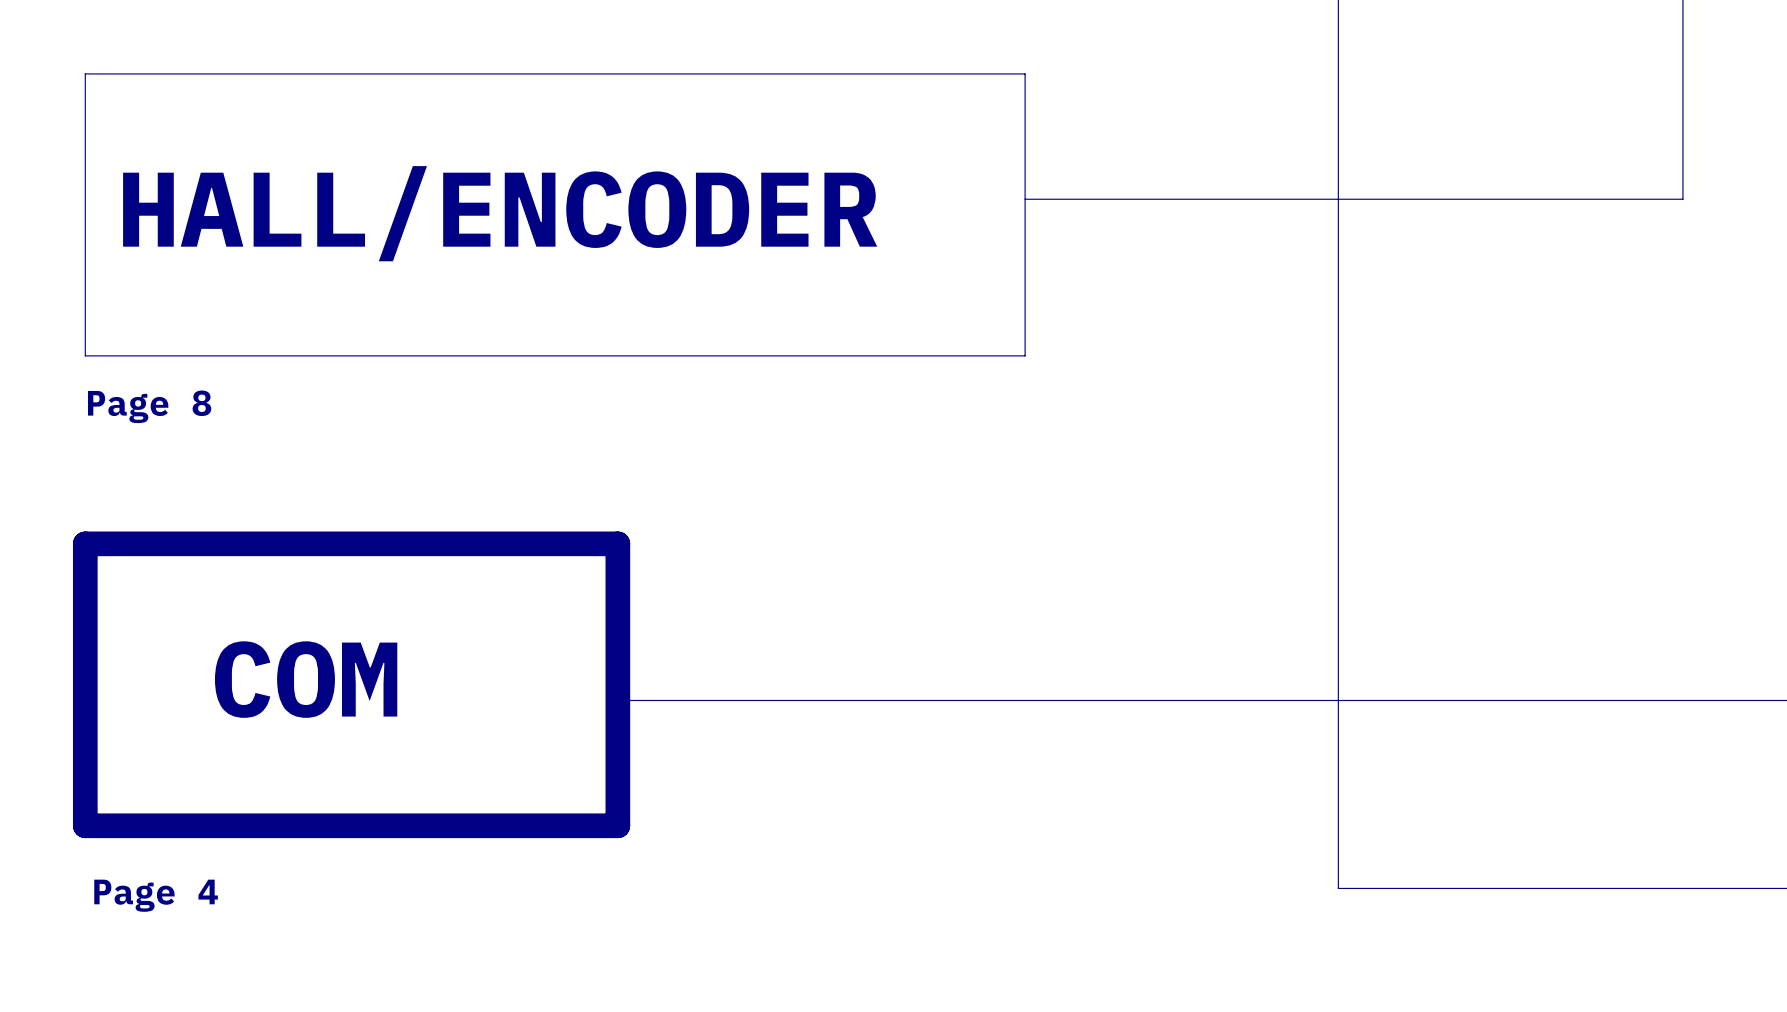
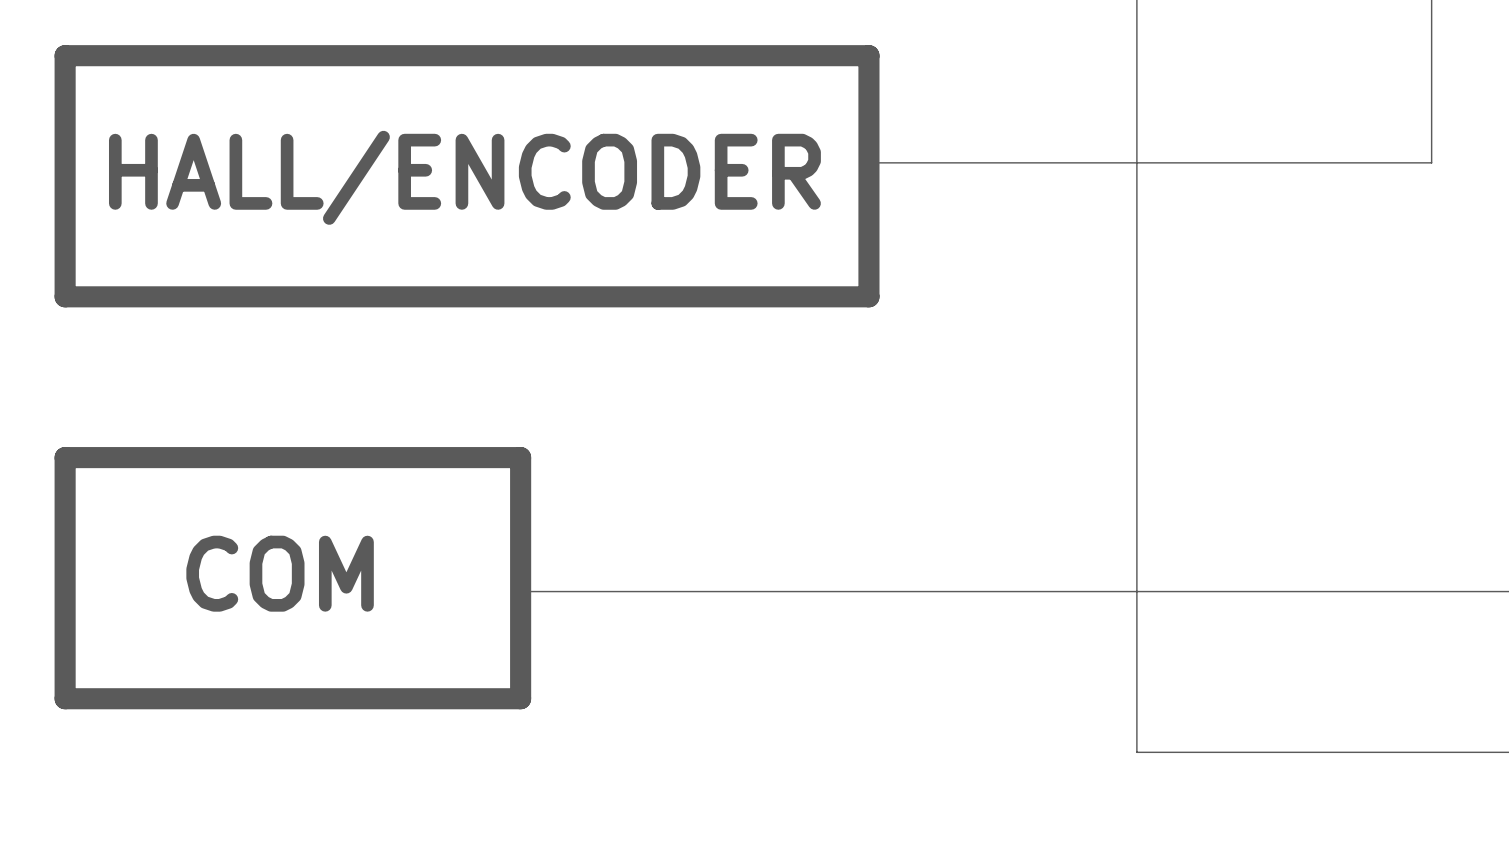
line width: thin (85, 73) (1025, 73) (1025, 355) (85, 355) (85, 73) -> thick (65, 55) (868, 55) (868, 296) (65, 296) (65, 55)
text: Page 8 (149, 406) -> none
text: Page 4 (156, 895) -> none

